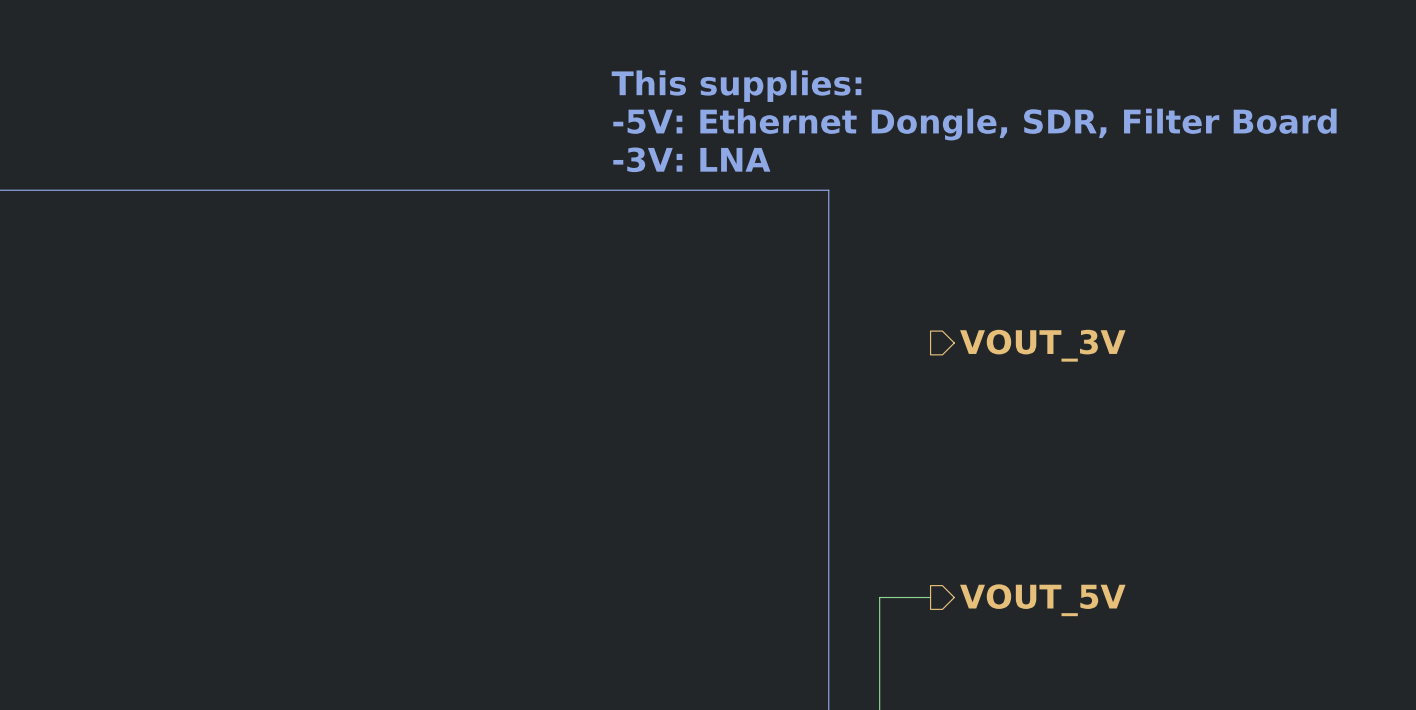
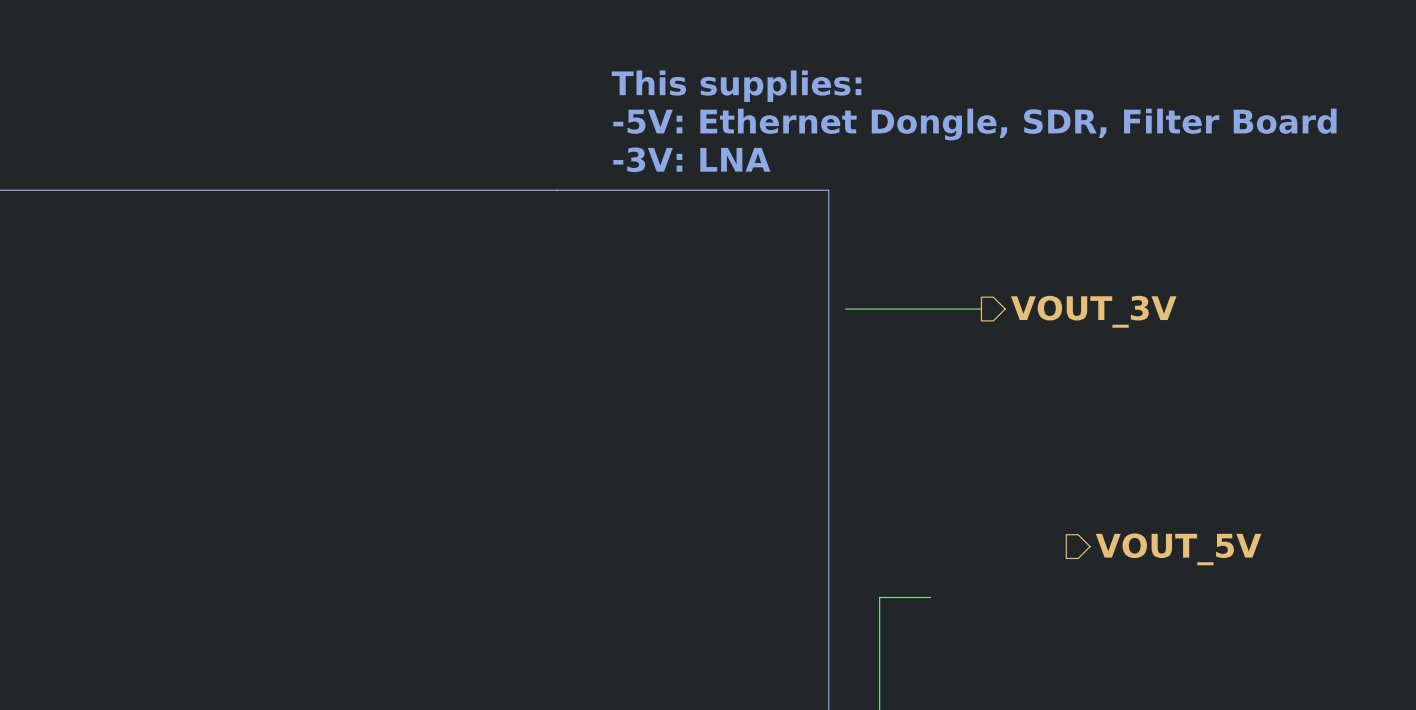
wire: none -> (845, 309) (981, 309)
hierarchical label position: VOUT_3V (1042, 345) -> VOUT_3V (1093, 311)
hierarchical label position: VOUT_5V (1042, 600) -> VOUT_5V (1178, 549)

